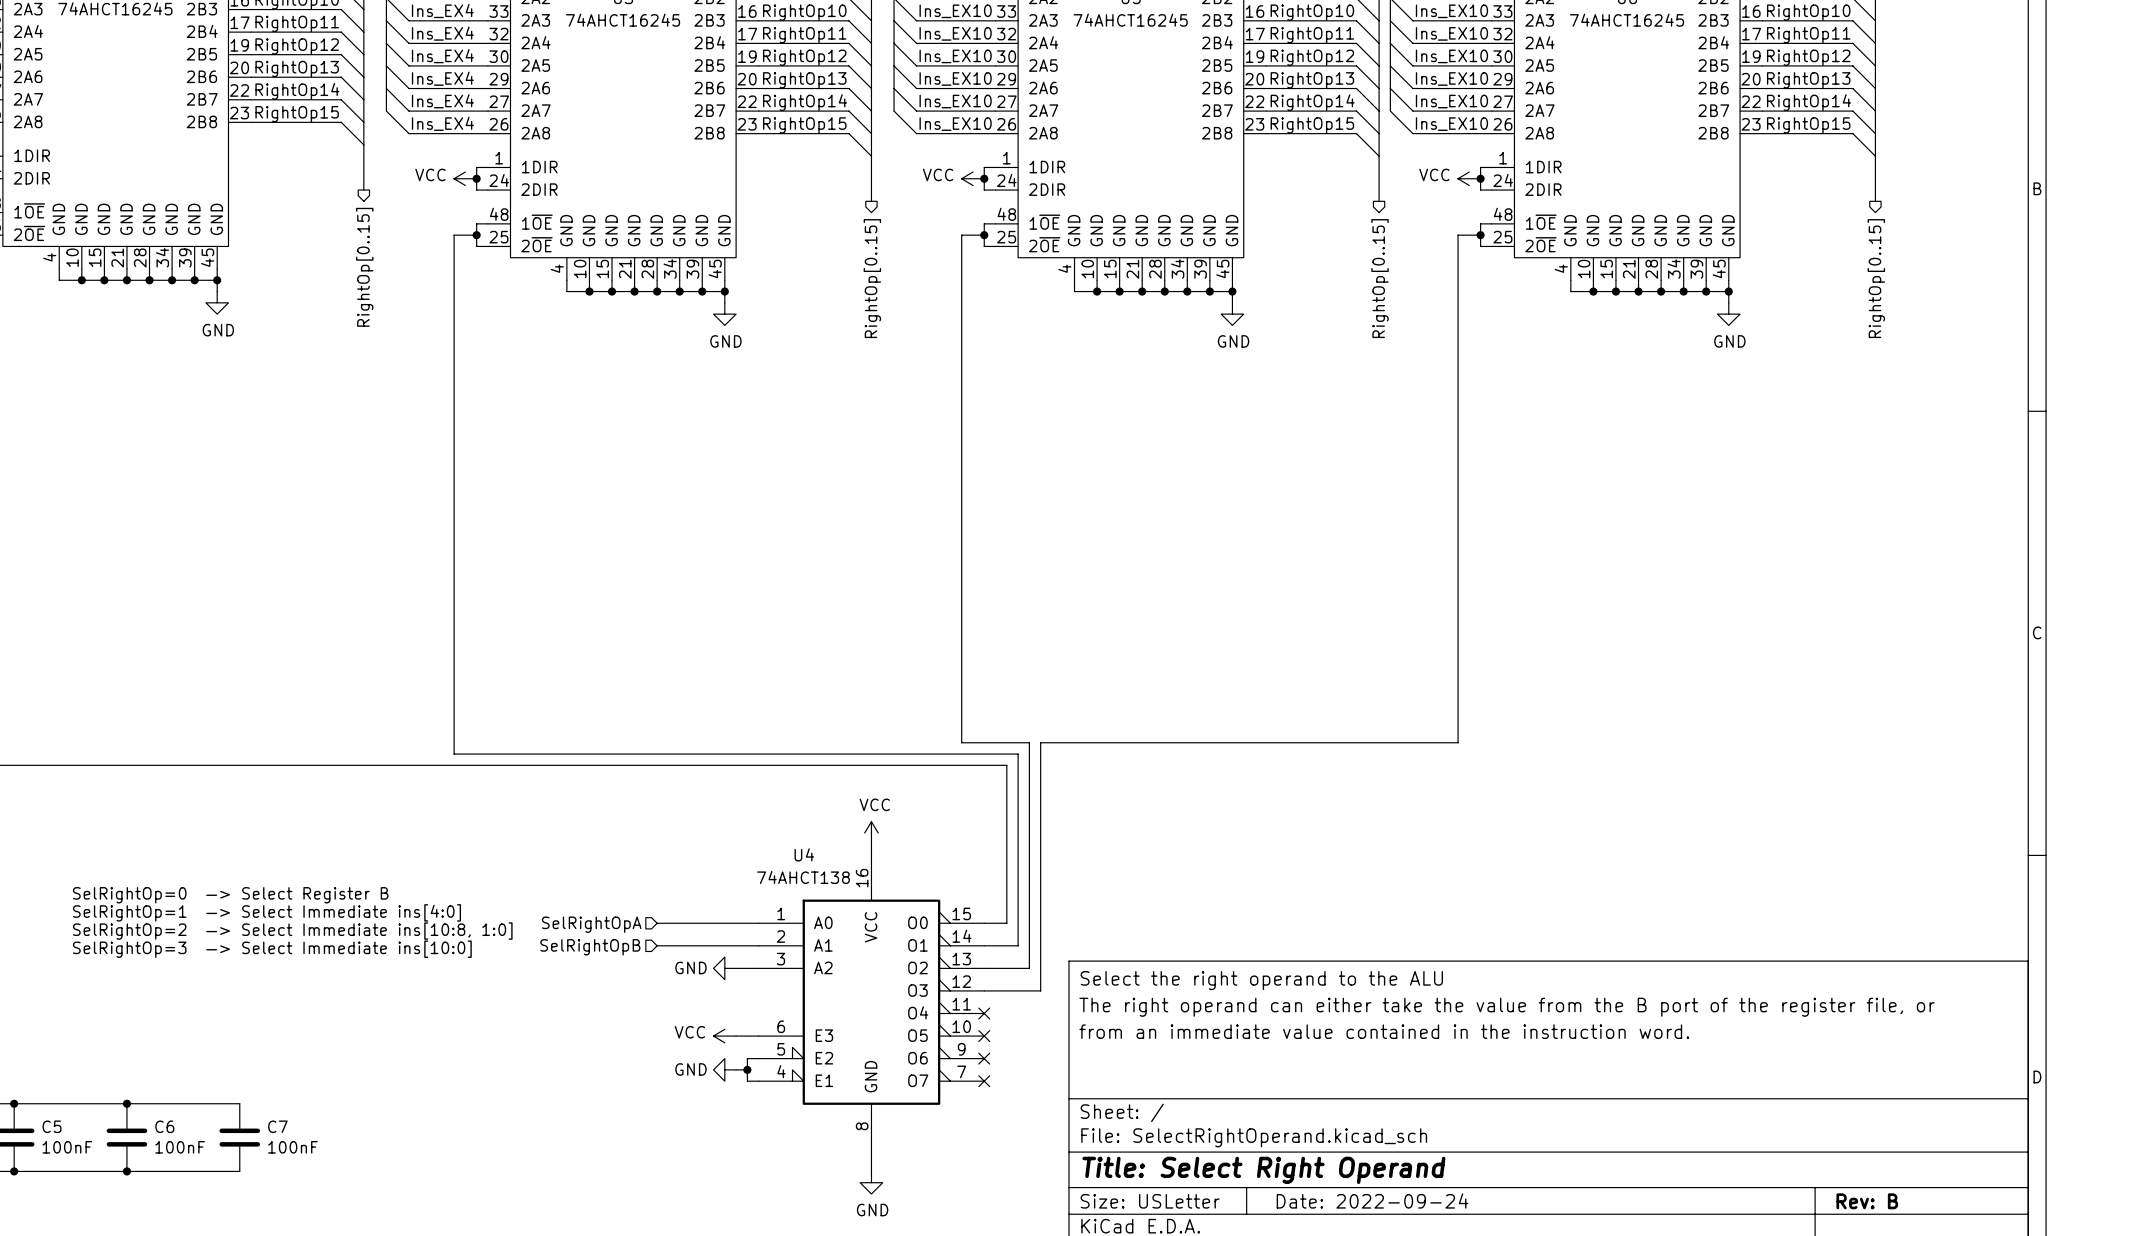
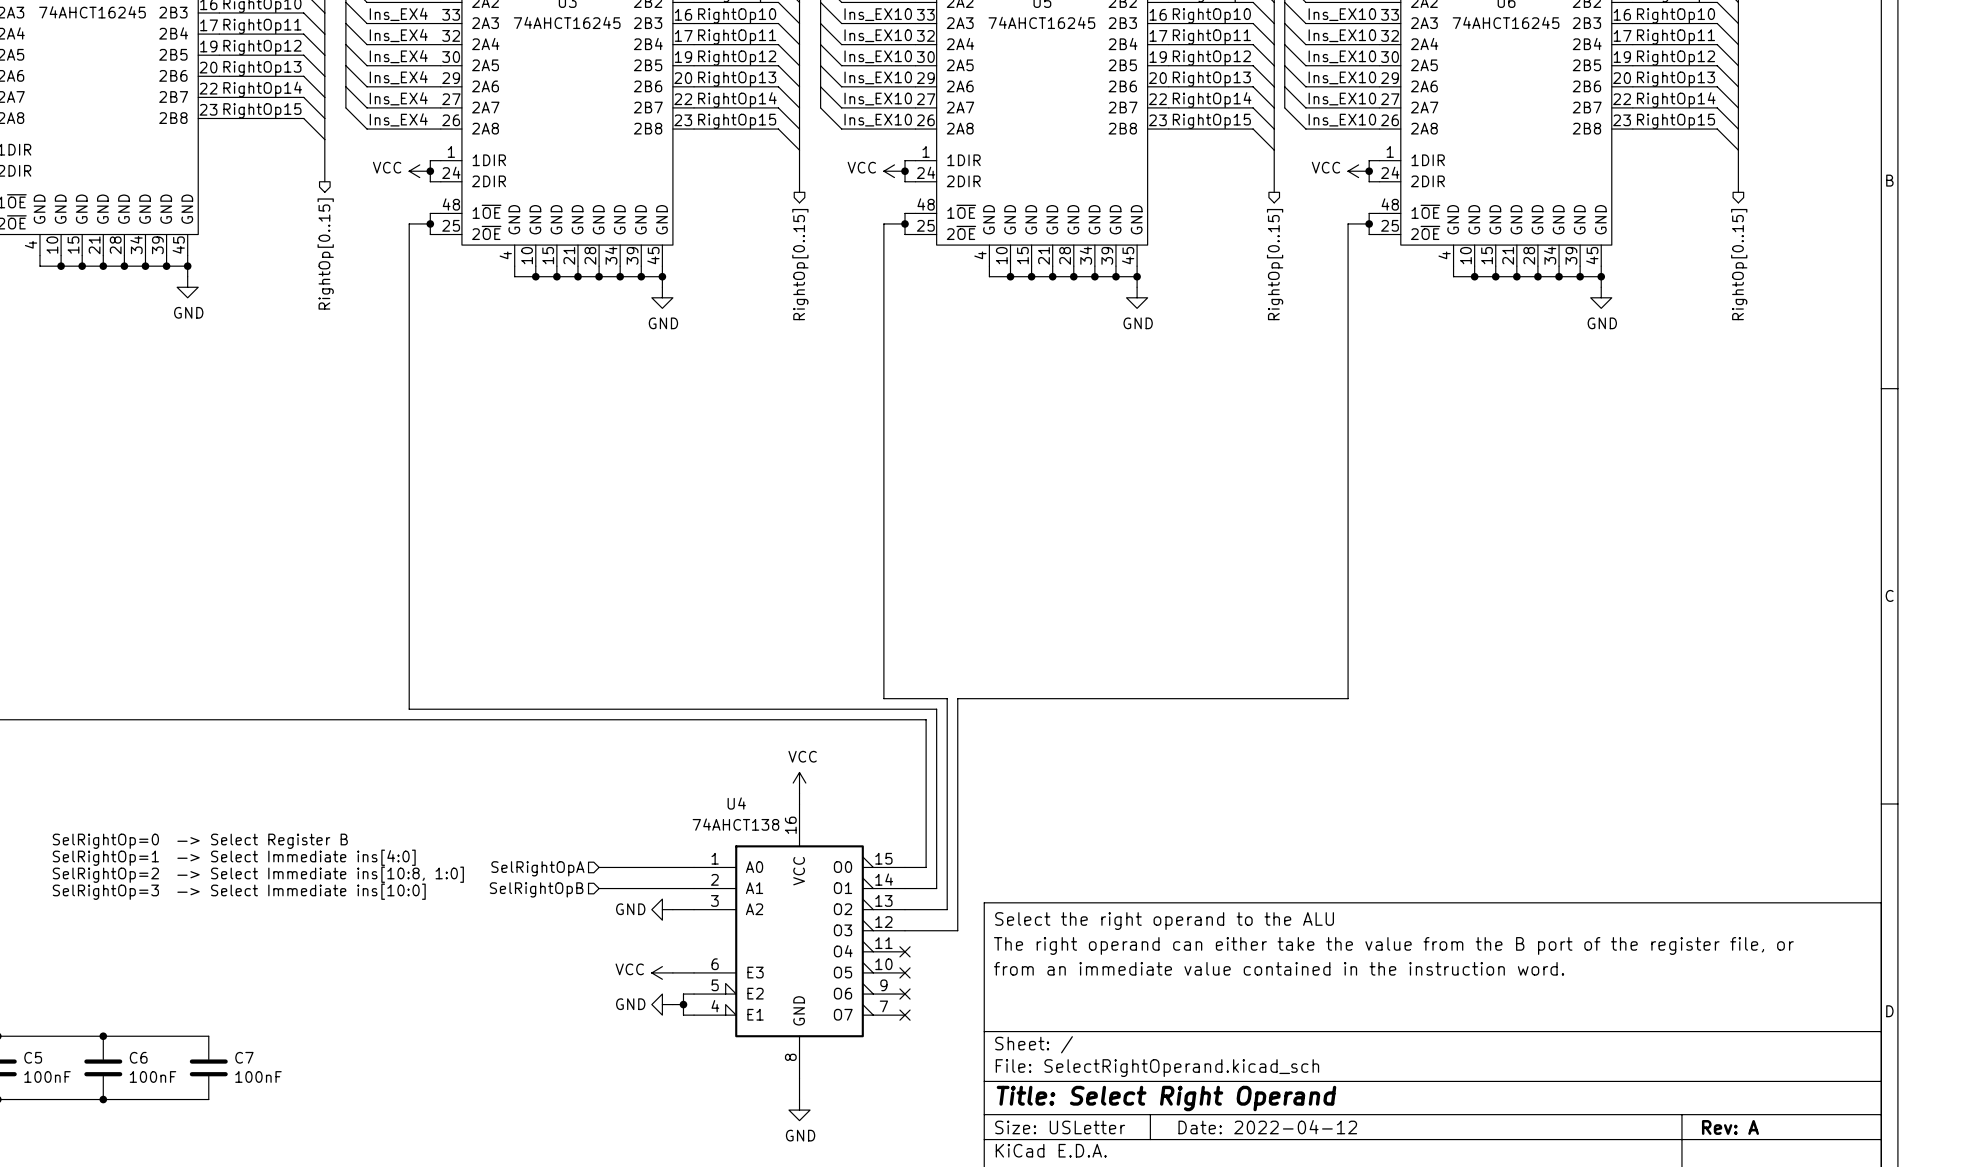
title block: Date: 2022-09-24 (1372, 1200) -> Date: 2022-04-12 (1267, 1127)
title block: Rev: B (1867, 1201) -> Rev: A (1730, 1127)

